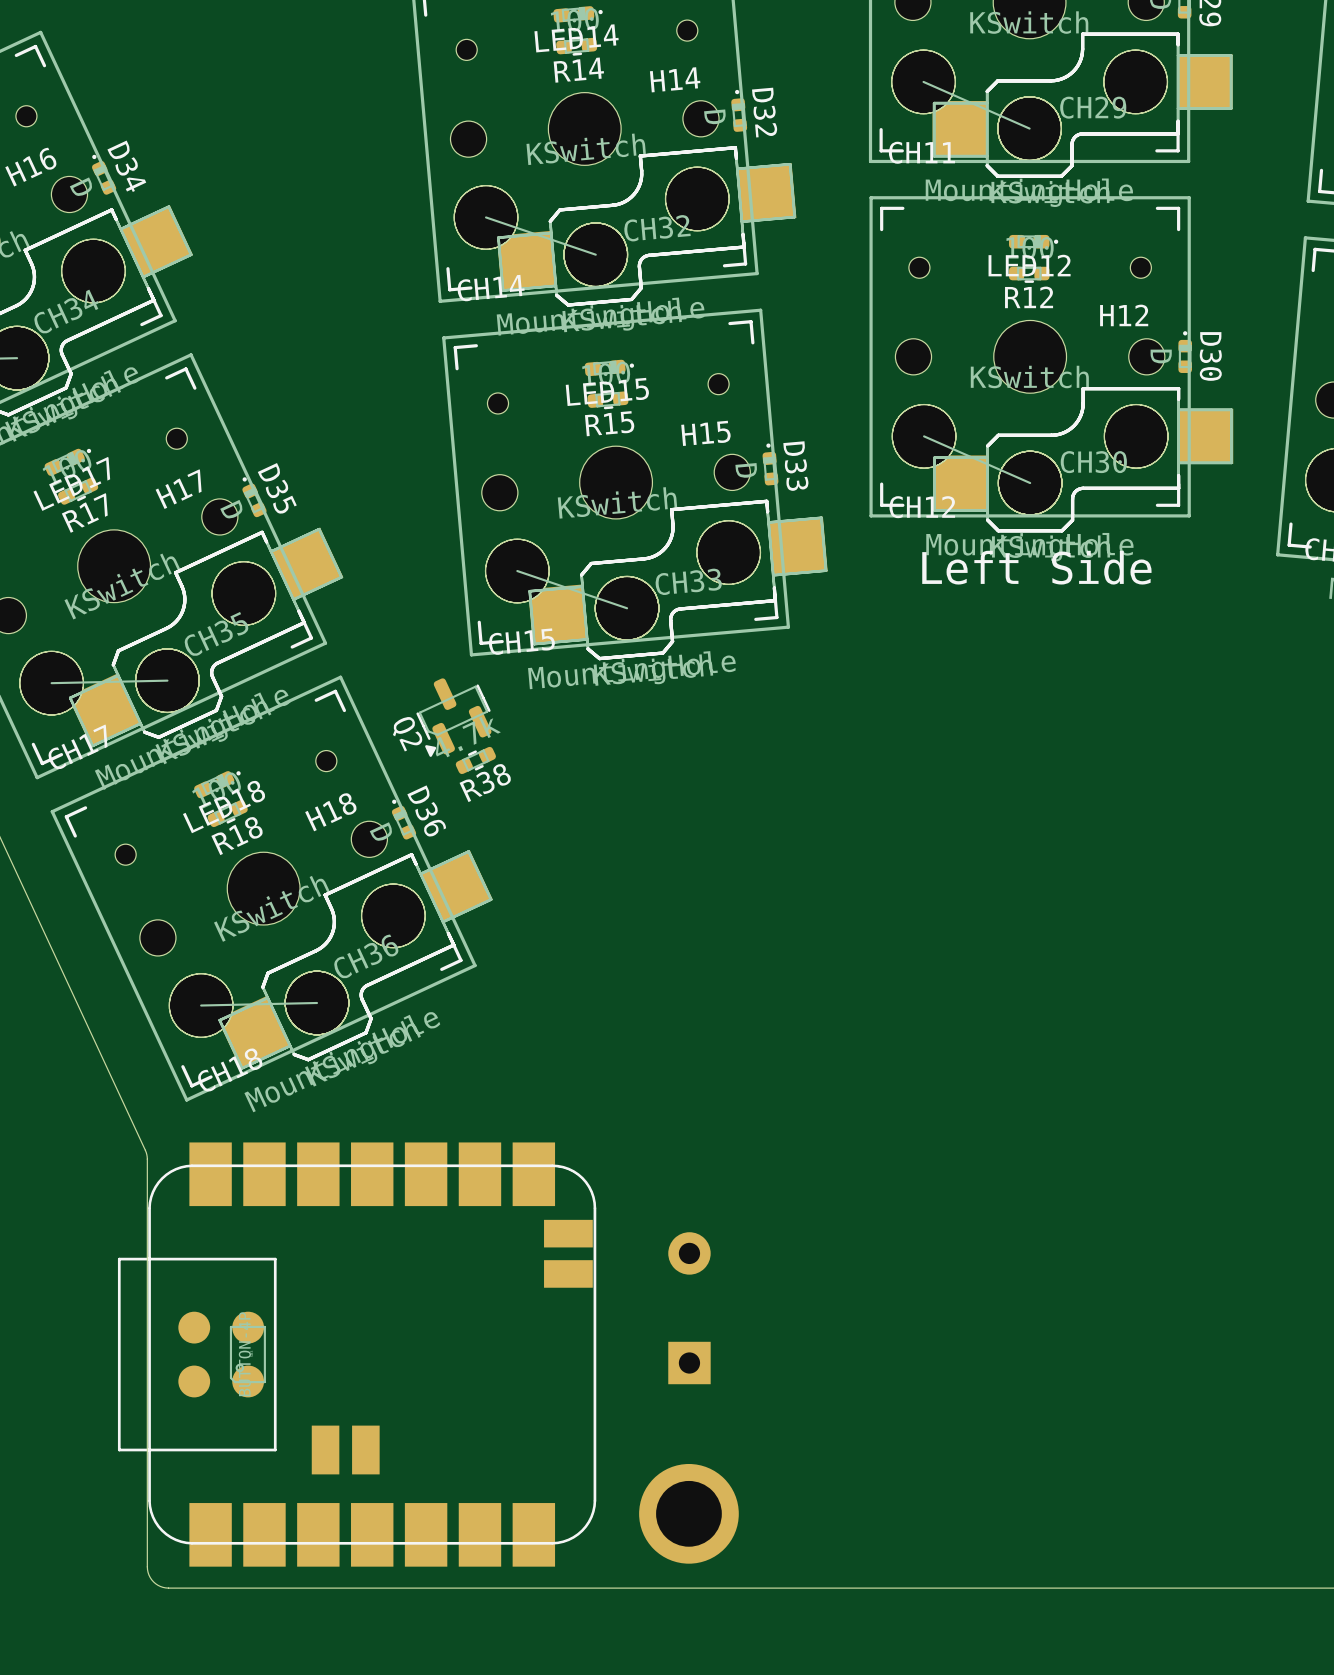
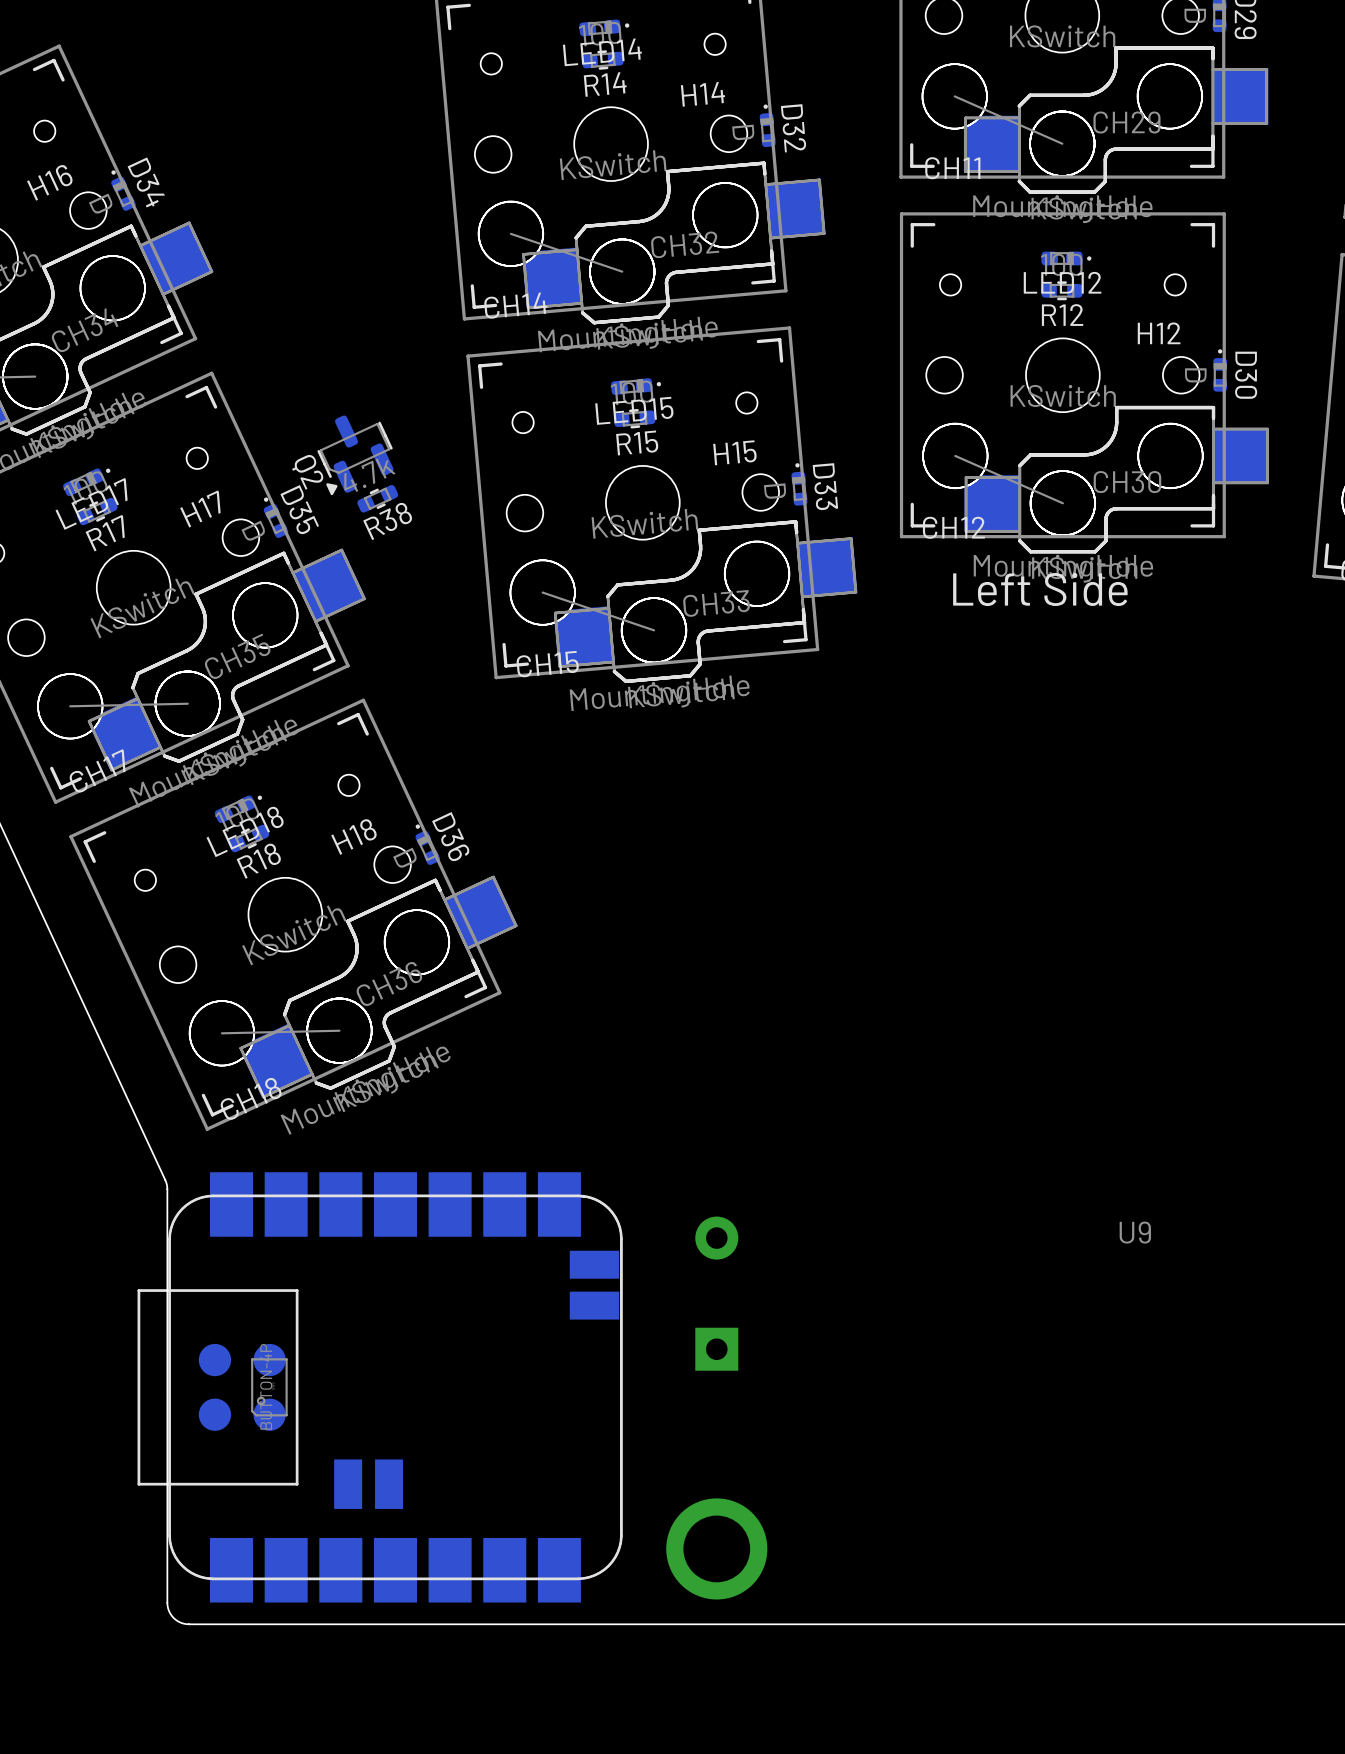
Q2 position: (453, 717) -> (355, 455)
R38 position: (475, 760) -> (377, 498)
U9: none -> (1135, 1232)
part position: (689, 1253) -> (716, 1238)
part position: (689, 1363) -> (716, 1349)

